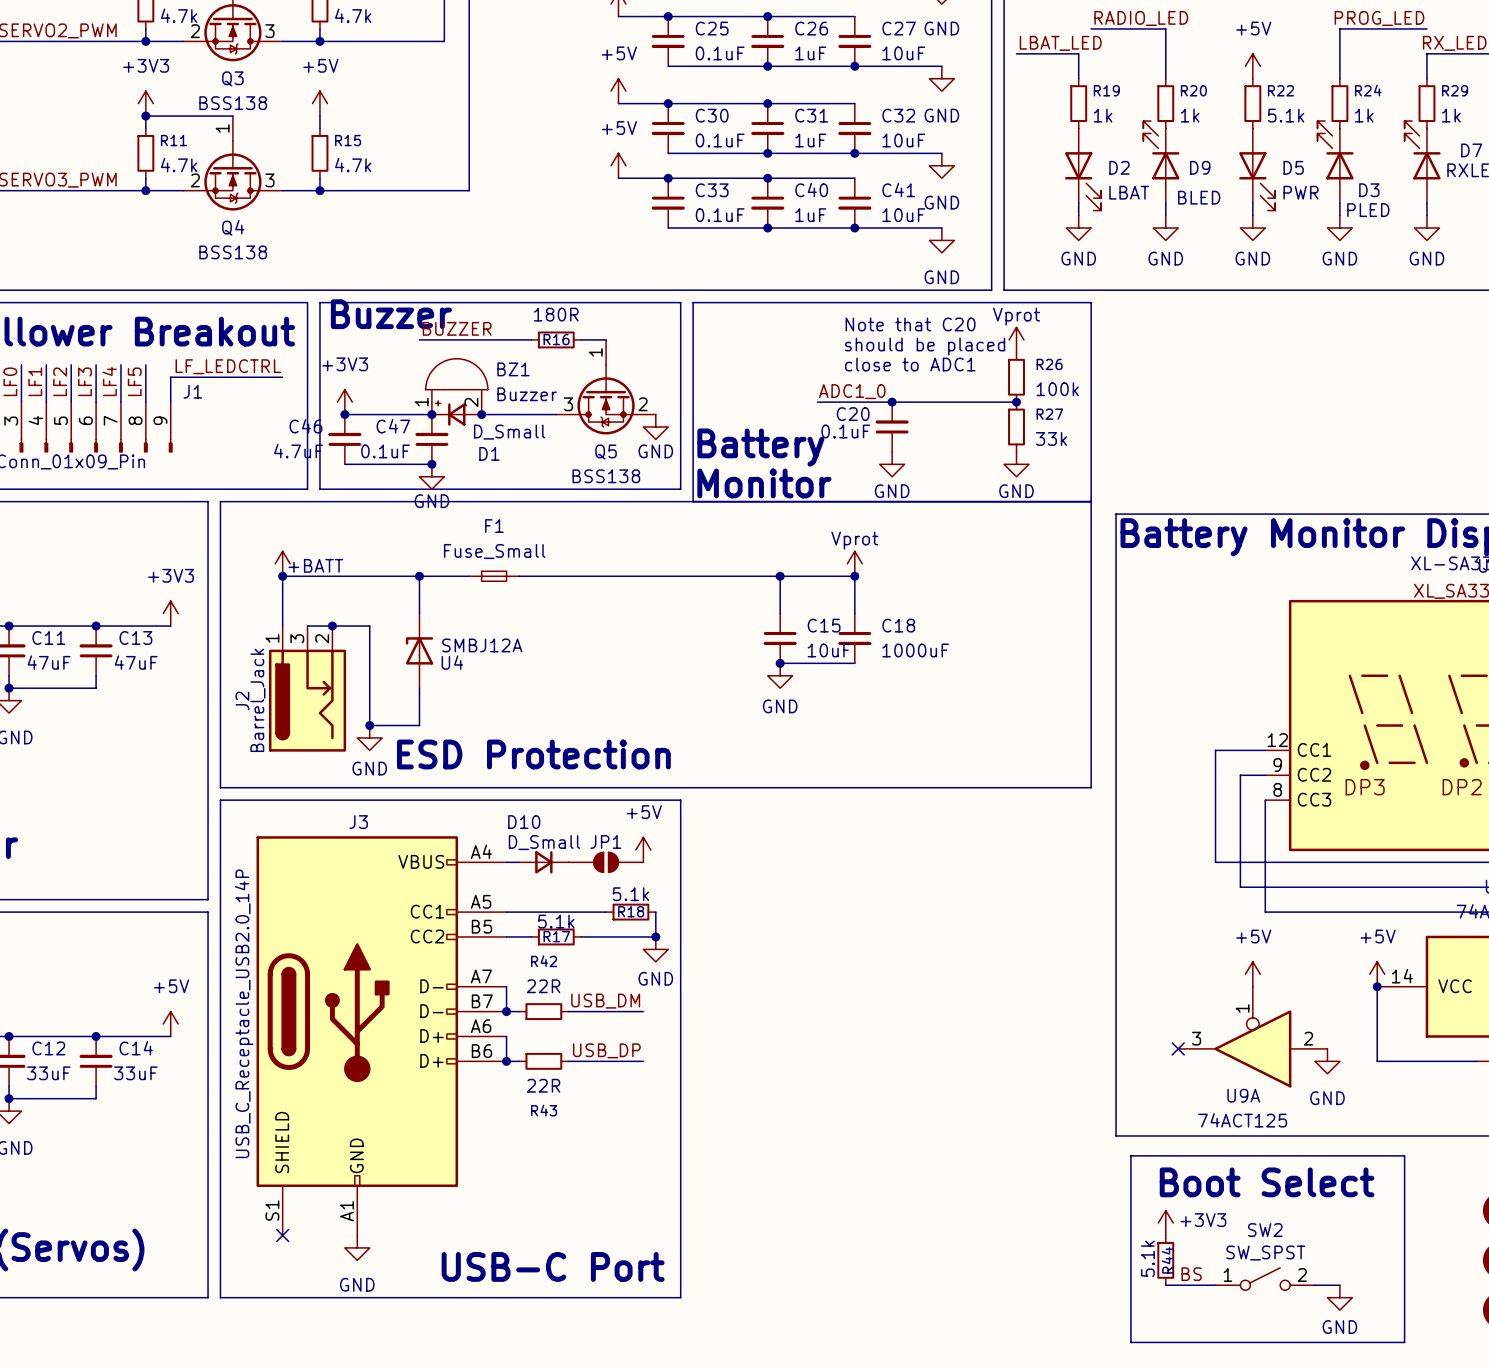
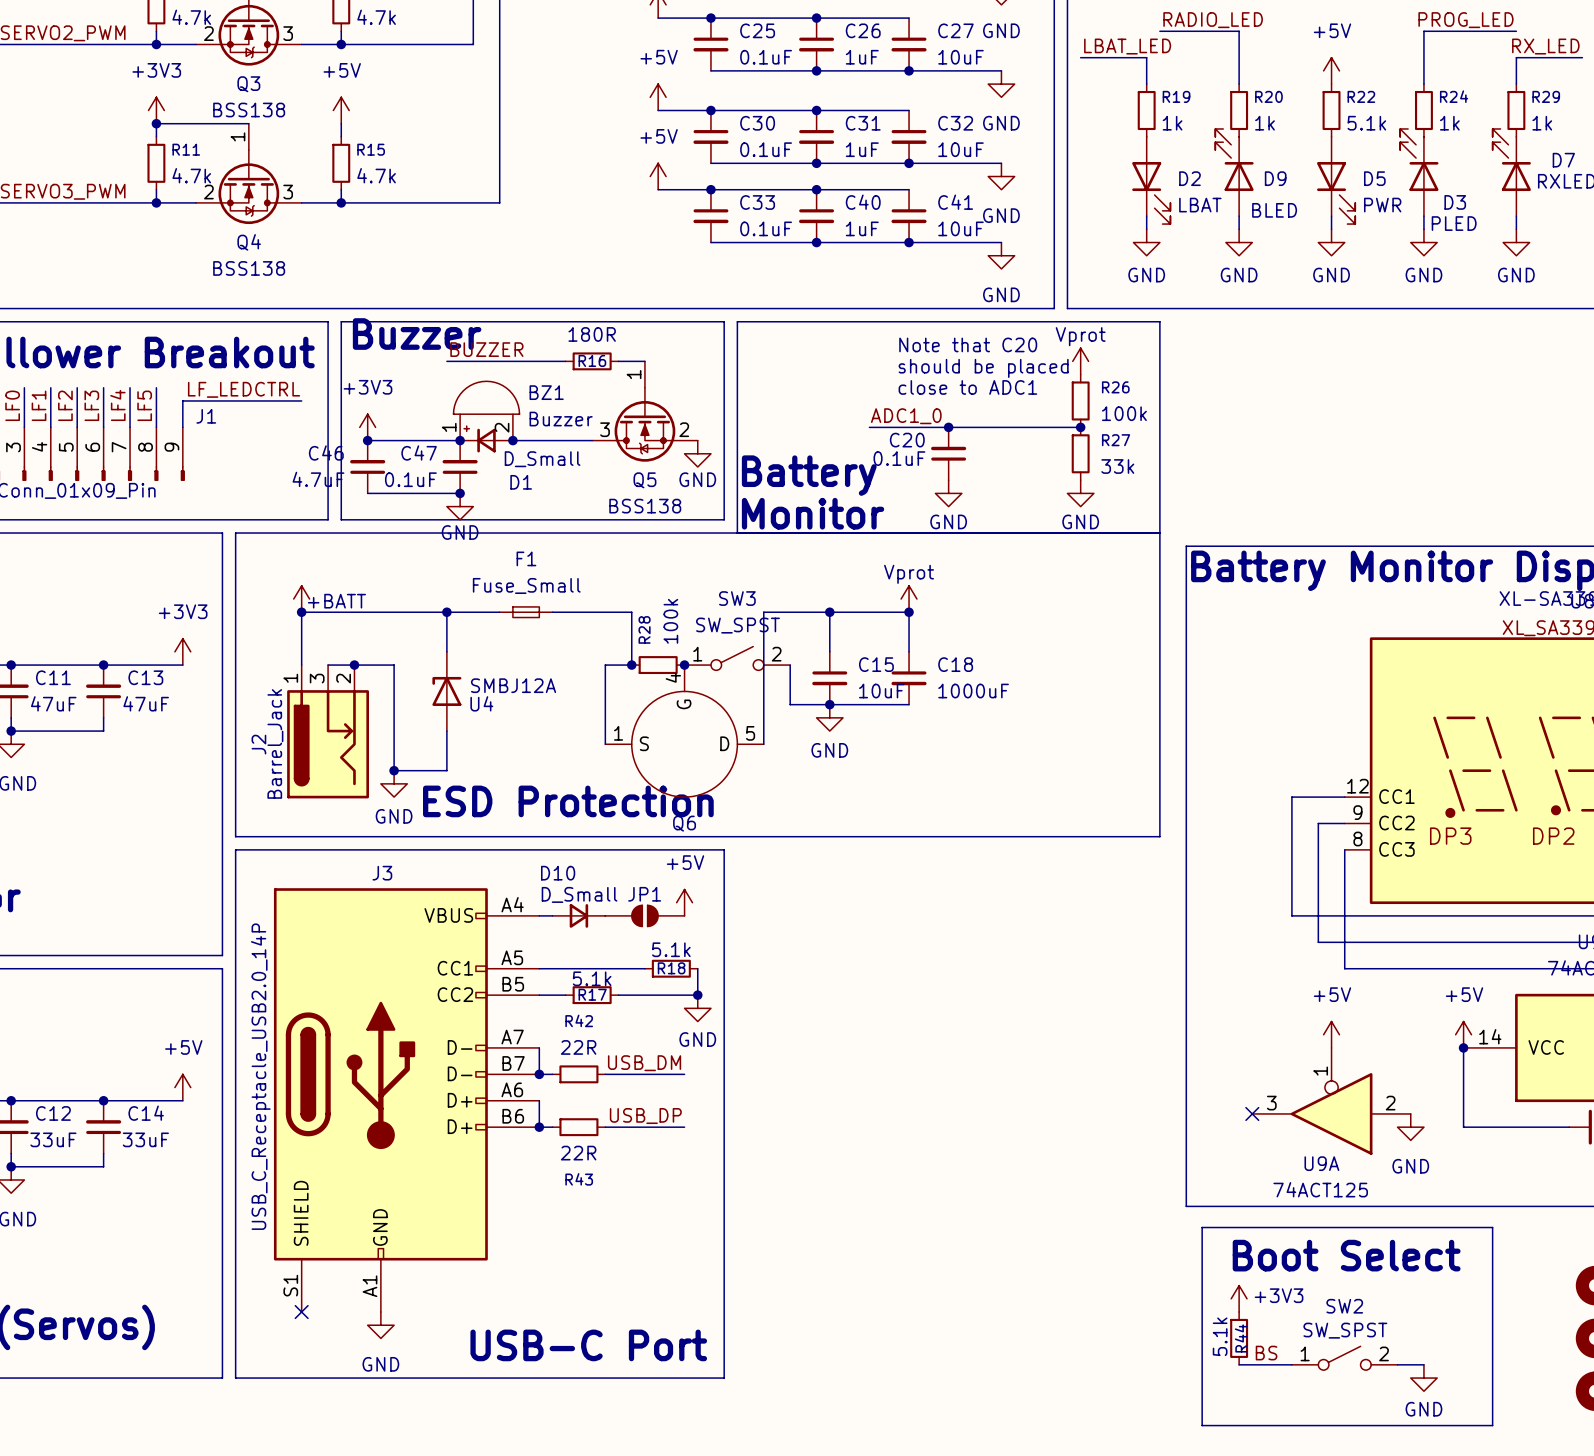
wire: (593, 576) (718, 576) -> (763, 744) (763, 612)
wire: none -> (631, 612) (631, 665) (605, 665) (605, 744)
SW3: none -> SW_SPST (737, 658)
junction: none -> (631, 665)
R28: none -> 100k (658, 665)
junction: none -> (684, 665)
wire: none -> (790, 665) (790, 704) (829, 704)
Q6: none -> (684, 731)

